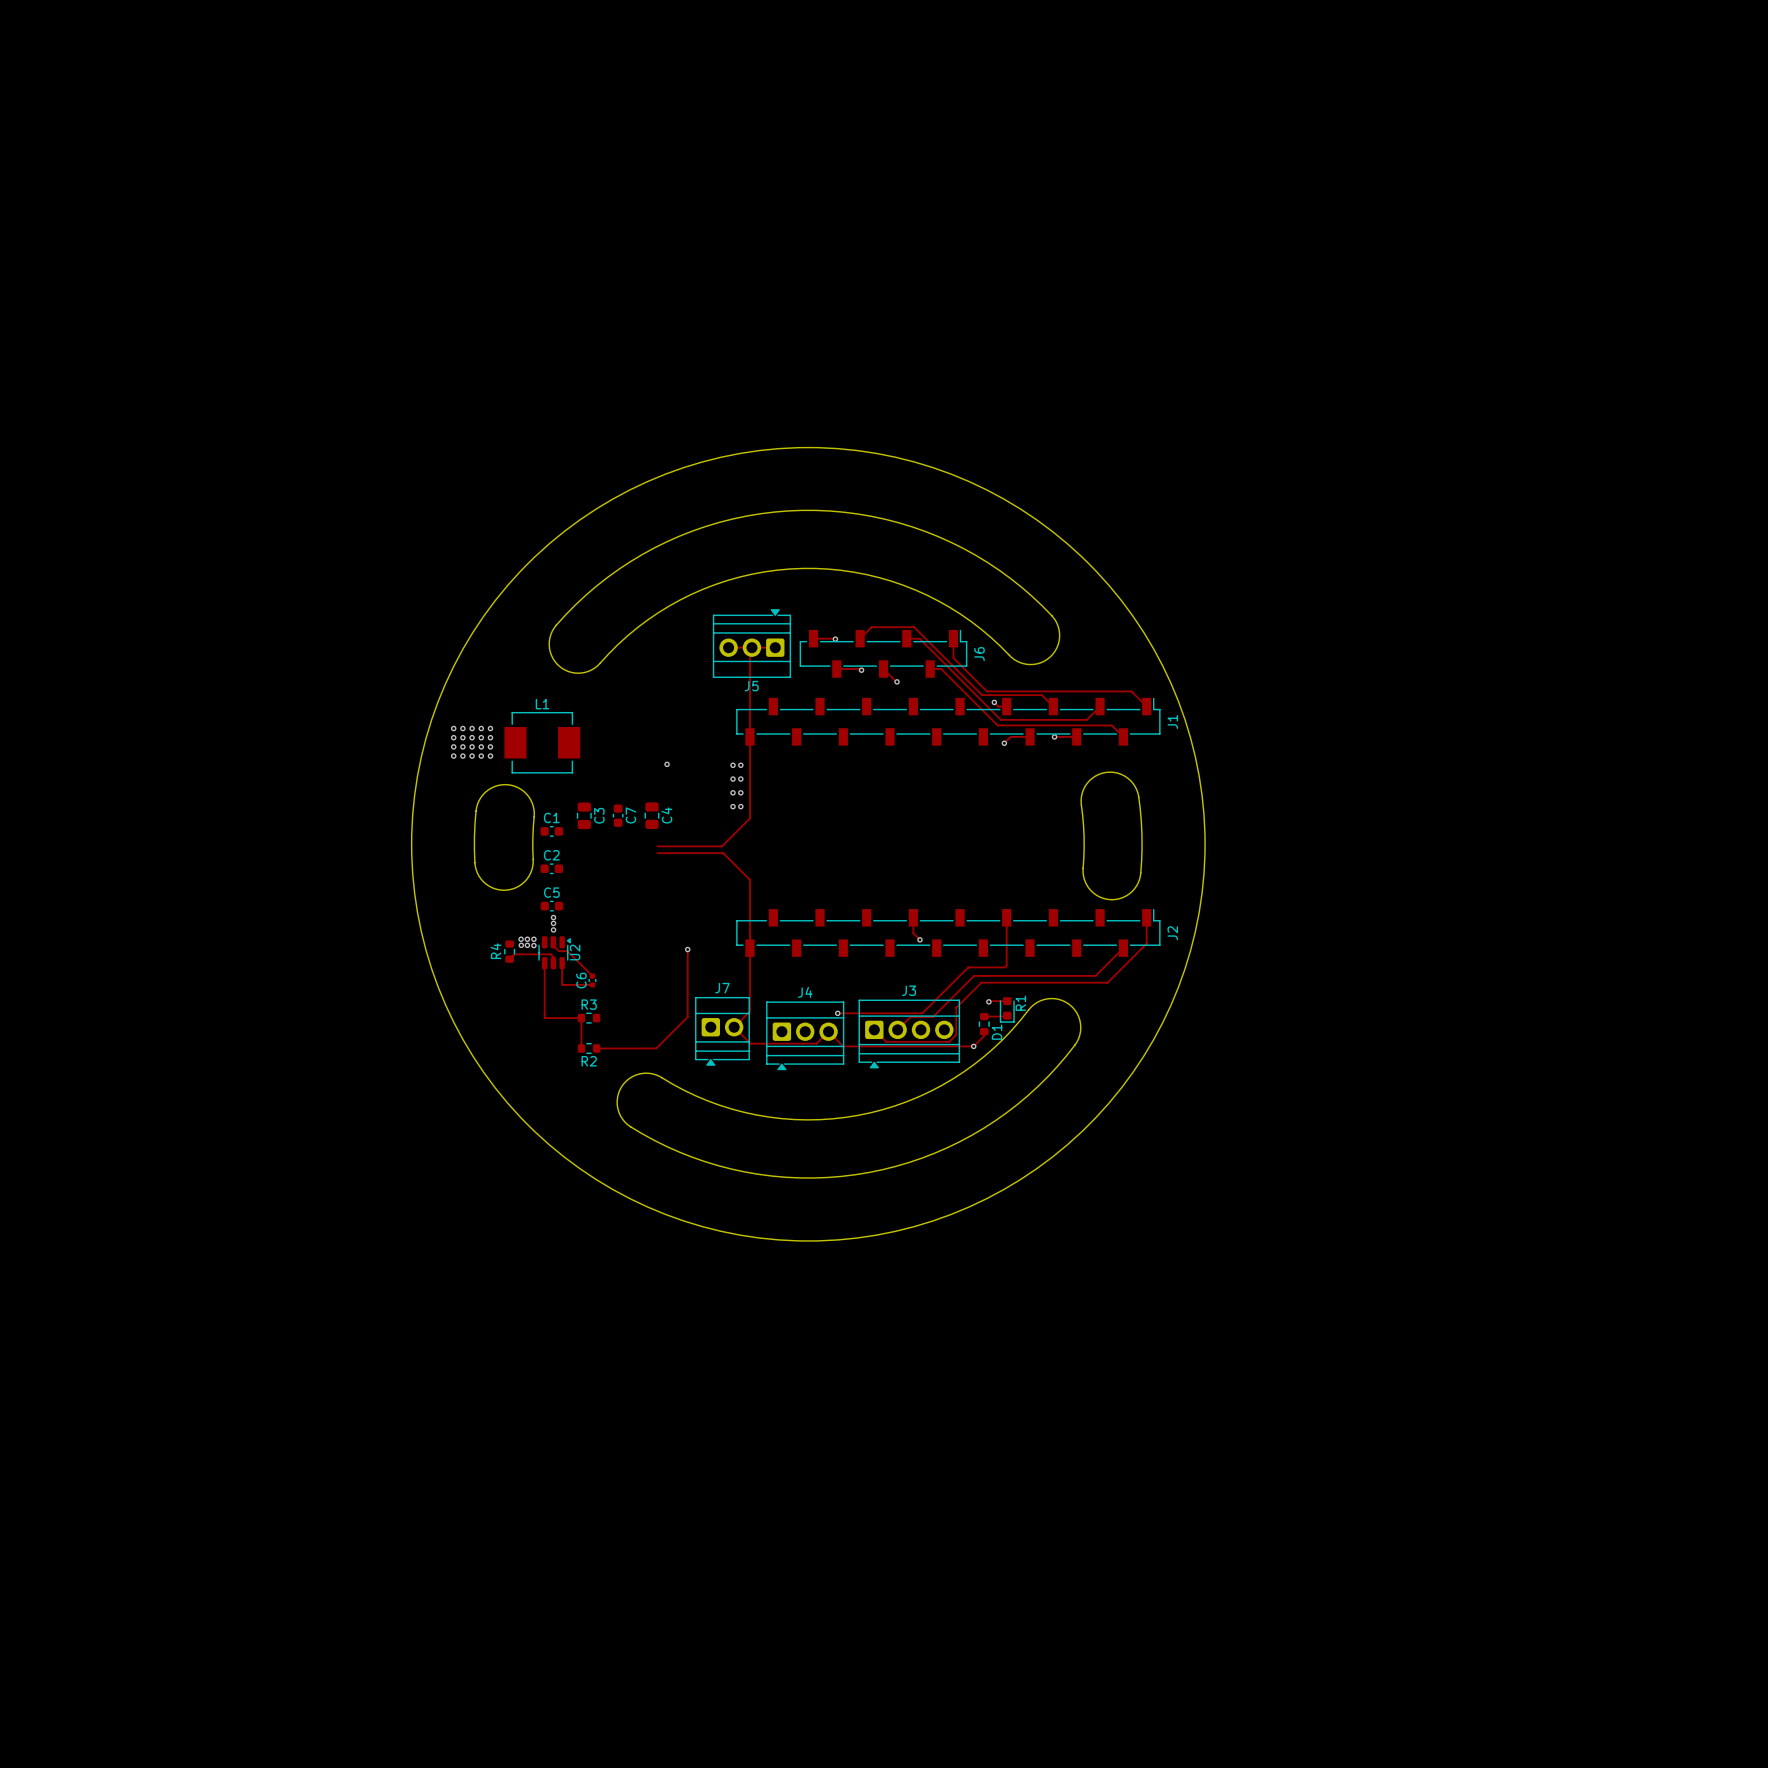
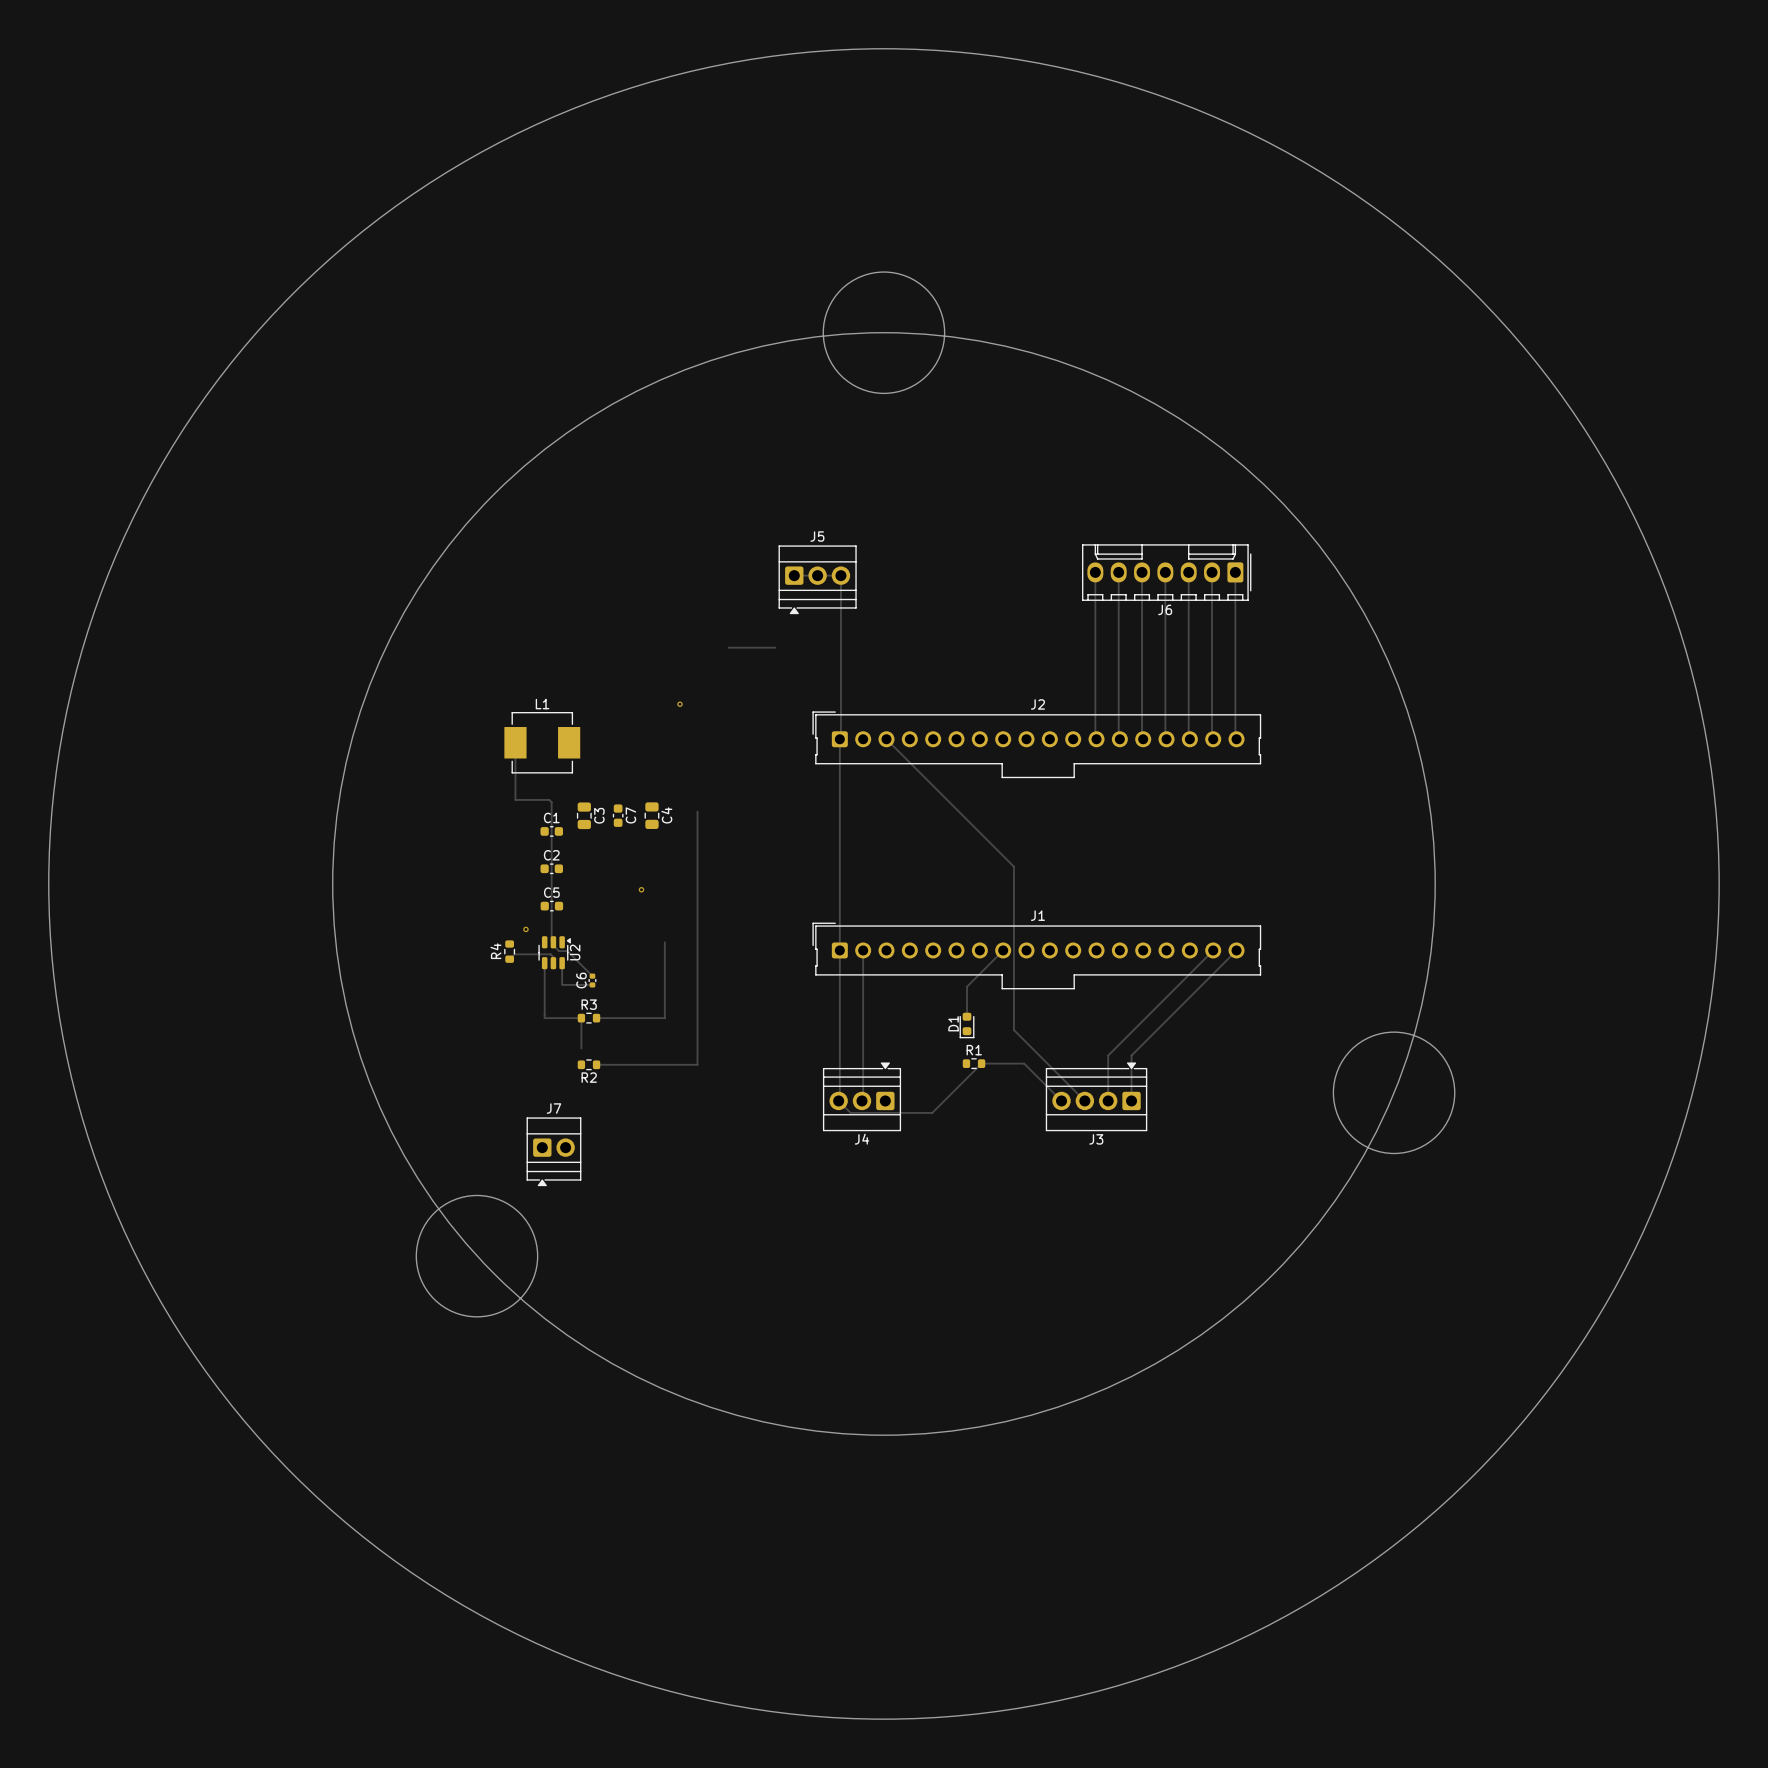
round board edge: none -> [48, 48, 1720, 1720]
round board edge: none -> [823, 271, 945, 394]
round board edge: none -> [332, 332, 1436, 1436]
round board edge: [411, 447, 1206, 1242] -> none
track: none -> (1095, 572) (1096, 739)
track: none -> (1118, 572) (1119, 739)
track: none -> (1142, 572) (1143, 739)
track: none -> (1165, 572) (1166, 739)
track: none -> (1188, 572) (1189, 739)
track: none -> (1212, 572) (1213, 739)
track: none -> (1235, 572) (1236, 739)
track: none -> (794, 575) (840, 575) (838, 1100) (850, 1112) (932, 1112) (981, 1063) (1024, 1063) (1061, 1100)
board edge: (1051, 615) (1059, 632) (1055, 650) (1044, 661) (1025, 664) (1012, 657) (991, 637) (960, 614) (915, 590) (879, 577) (854, 572) (828, 569) (790, 568) (739, 577) (715, 584) (680, 600) (637, 627) (597, 665) (585, 672) (571, 672) (562, 668) (552, 657) (549, 644) (554, 627) (575, 604) (607, 577) (642, 554) (666, 541) (705, 526) (746, 516) (788, 510) (829, 511) (857, 513) (898, 522) (938, 536) (975, 555) (999, 570) (1021, 587) (1051, 615) -> none
J6 footprint: [799, 629, 968, 678] -> [1082, 544, 1252, 601]
track: (813, 638) (835, 639) -> none
track: (860, 638) (871, 627) (914, 627) (982, 695) (1041, 695) (1053, 706) -> none
track: (906, 638) (919, 638) (1000, 719) (1086, 719) (1100, 706) -> none
track: (953, 638) (953, 658) (986, 691) (1131, 691) (1146, 706) -> none
via: (835, 639) -> none
J5 rotation: 0° (751, 643) -> 180° (817, 579)
J5 position: (751, 643) -> (817, 579)
track: (751, 647) (750, 649) (750, 818) (722, 846) (657, 846) -> none
J6 name position: J6 (979, 654) -> J6 (1165, 609)
track: (836, 669) (861, 670) -> none
track: (883, 669) (897, 681) -> none
track: (930, 669) (941, 669) (997, 725) (1111, 725) (1123, 736) -> none
via: (861, 670) -> none
via: (897, 681) -> none
J1 footprint: [736, 697, 1161, 746] -> [812, 922, 1262, 990]
track: (994, 702) (998, 706) (1006, 706) -> none
via: (994, 702) -> none
via: none -> (679, 704)
J1 name position: J1 (1172, 721) -> J1 (1037, 915)
via: (453, 728) -> none
via: (462, 728) -> none
via: (472, 728) -> none
via: (481, 728) -> none
via: (490, 728) -> none
track: (1030, 736) (1010, 736) (1004, 743) -> none
track: (1054, 736) (1076, 736) -> none
via: (1054, 736) -> none
via: (453, 737) -> none
via: (462, 737) -> none
via: (472, 737) -> none
via: (481, 737) -> none
via: (490, 737) -> none
track: none -> (886, 739) (1013, 866) (1013, 1030) (1084, 1100)
track: none -> (515, 742) (515, 799) (549, 799) (551, 802) (551, 940) (553, 942)
via: (1004, 743) -> none
via: (453, 746) -> none
via: (462, 746) -> none
via: (472, 746) -> none
via: (481, 746) -> none
via: (490, 746) -> none
via: (453, 756) -> none
via: (462, 756) -> none
via: (472, 756) -> none
via: (481, 756) -> none
via: (490, 756) -> none
via: (667, 764) -> none
via: (733, 765) -> none
via: (740, 765) -> none
via: (733, 779) -> none
via: (740, 779) -> none
via: (733, 792) -> none
via: (740, 792) -> none
board edge: (1138, 797) (1130, 780) (1113, 772) (1095, 776) (1083, 790) (1081, 801) (1084, 836) (1083, 875) (1091, 890) (1102, 898) (1113, 899) (1126, 895) (1134, 889) (1139, 880) (1142, 847) (1138, 797) -> none
via: (733, 806) -> none
via: (740, 806) -> none
board edge: (476, 810) (474, 862) (478, 876) (485, 883) (495, 888) (509, 889) (519, 886) (526, 879) (532, 866) (534, 813) (530, 799) (518, 787) (508, 784) (497, 785) (482, 794) (476, 810) -> none
track: none -> (697, 811) (697, 1064) (596, 1064)
track: (657, 853) (723, 853) (750, 879) (750, 1011) (734, 1027) (750, 1043) (816, 1043) (828, 1031) (843, 1046) (973, 1046) (984, 1035) (984, 1031) -> none
via: none -> (641, 889)
J2 footprint: [736, 909, 1161, 957] -> [812, 711, 1262, 779]
via: (553, 917) -> none
track: (913, 917) (913, 933) (919, 939) -> none
track: (1006, 917) (1006, 965) (1004, 967) (968, 967) (922, 1013) (837, 1013) -> none
track: (1146, 917) (1146, 943) (1107, 982) (981, 982) (956, 1007) (956, 1034) (949, 1041) (886, 1041) (874, 1029) -> none
via: (553, 923) -> none
via: none -> (525, 929)
via: (553, 929) -> none
J2 name position: J2 (1172, 933) -> J2 (1037, 704)
via: (521, 939) -> none
via: (527, 939) -> none
via: (533, 939) -> none
via: (919, 939) -> none
track: none -> (664, 942) (664, 1018) (597, 1018)
via: (521, 945) -> none
via: (527, 945) -> none
via: (533, 945) -> none
track: (1123, 948) (1095, 975) (974, 975) (932, 1017) (910, 1017) (897, 1029) -> none
track: (687, 949) (687, 1016) (656, 1048) (596, 1048) -> none
via: (687, 949) -> none
track: none -> (863, 950) (862, 1100)
track: none -> (1003, 950) (967, 986) (967, 1016)
track: none -> (1213, 950) (1108, 1055) (1108, 1100)
track: none -> (1236, 950) (1131, 1055) (1131, 1100)
via: (988, 1001) -> none
track: (1007, 1001) (988, 1001) -> none
R1 name position: R1 (1020, 1003) -> R1 (974, 1050)
D1 position: (1007, 1009) -> (967, 1025)
board edge: (1028, 1010) (1040, 1000) (1055, 998) (1069, 1004) (1076, 1012) (1080, 1023) (1078, 1038) (1057, 1066) (1017, 1104) (971, 1135) (921, 1158) (882, 1169) (855, 1174) (814, 1178) (772, 1176) (732, 1169) (692, 1157) (654, 1140) (627, 1124) (617, 1108) (618, 1093) (623, 1083) (632, 1076) (647, 1073) (658, 1075) (707, 1100) (756, 1114) (781, 1118) (820, 1119) (870, 1112) (919, 1096) (964, 1071) (1003, 1039) (1028, 1010) -> none
via: (837, 1013) -> none
track: (1007, 1015) (984, 1016) -> none
R1 rotation: 0° (984, 1024) -> 90° clockwise (974, 1063)
R1 position: (984, 1024) -> (974, 1063)
J7 position: (722, 1031) -> (553, 1151)
round board edge: none -> [1333, 1031, 1455, 1154]
D1 name position: D1 (997, 1032) -> D1 (953, 1023)
J3 rotation: 0° (909, 1034) -> 180° (1096, 1096)
J3 position: (909, 1034) -> (1096, 1096)
J4 rotation: 0° (805, 1035) -> 180° (862, 1096)
J4 position: (805, 1035) -> (862, 1096)
via: (973, 1046) -> none
R2 position: (588, 1048) -> (588, 1064)
round board edge: none -> [416, 1195, 538, 1318]

